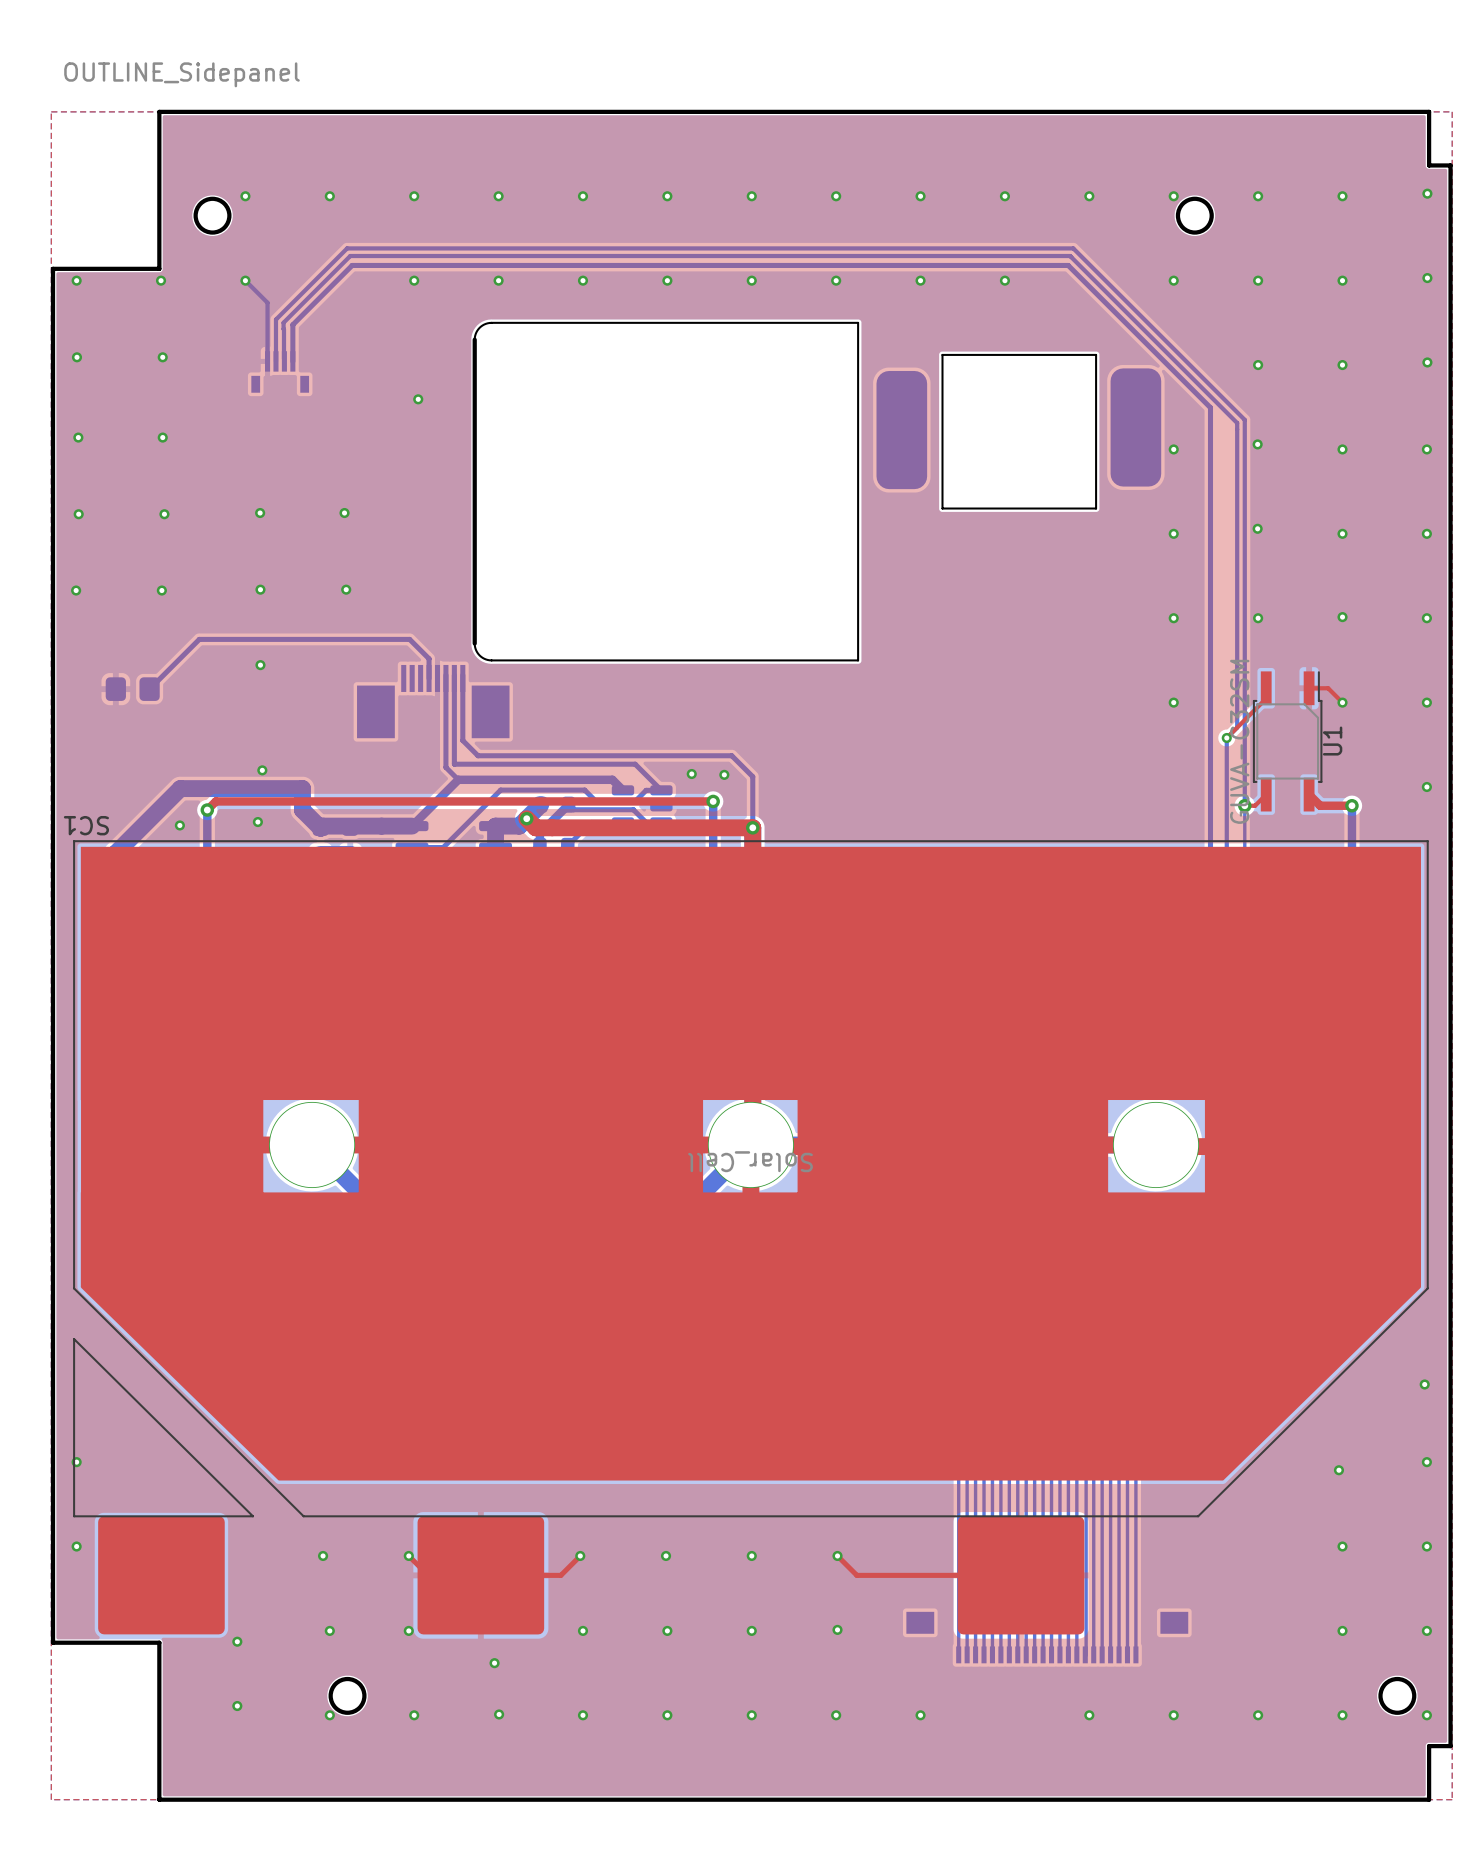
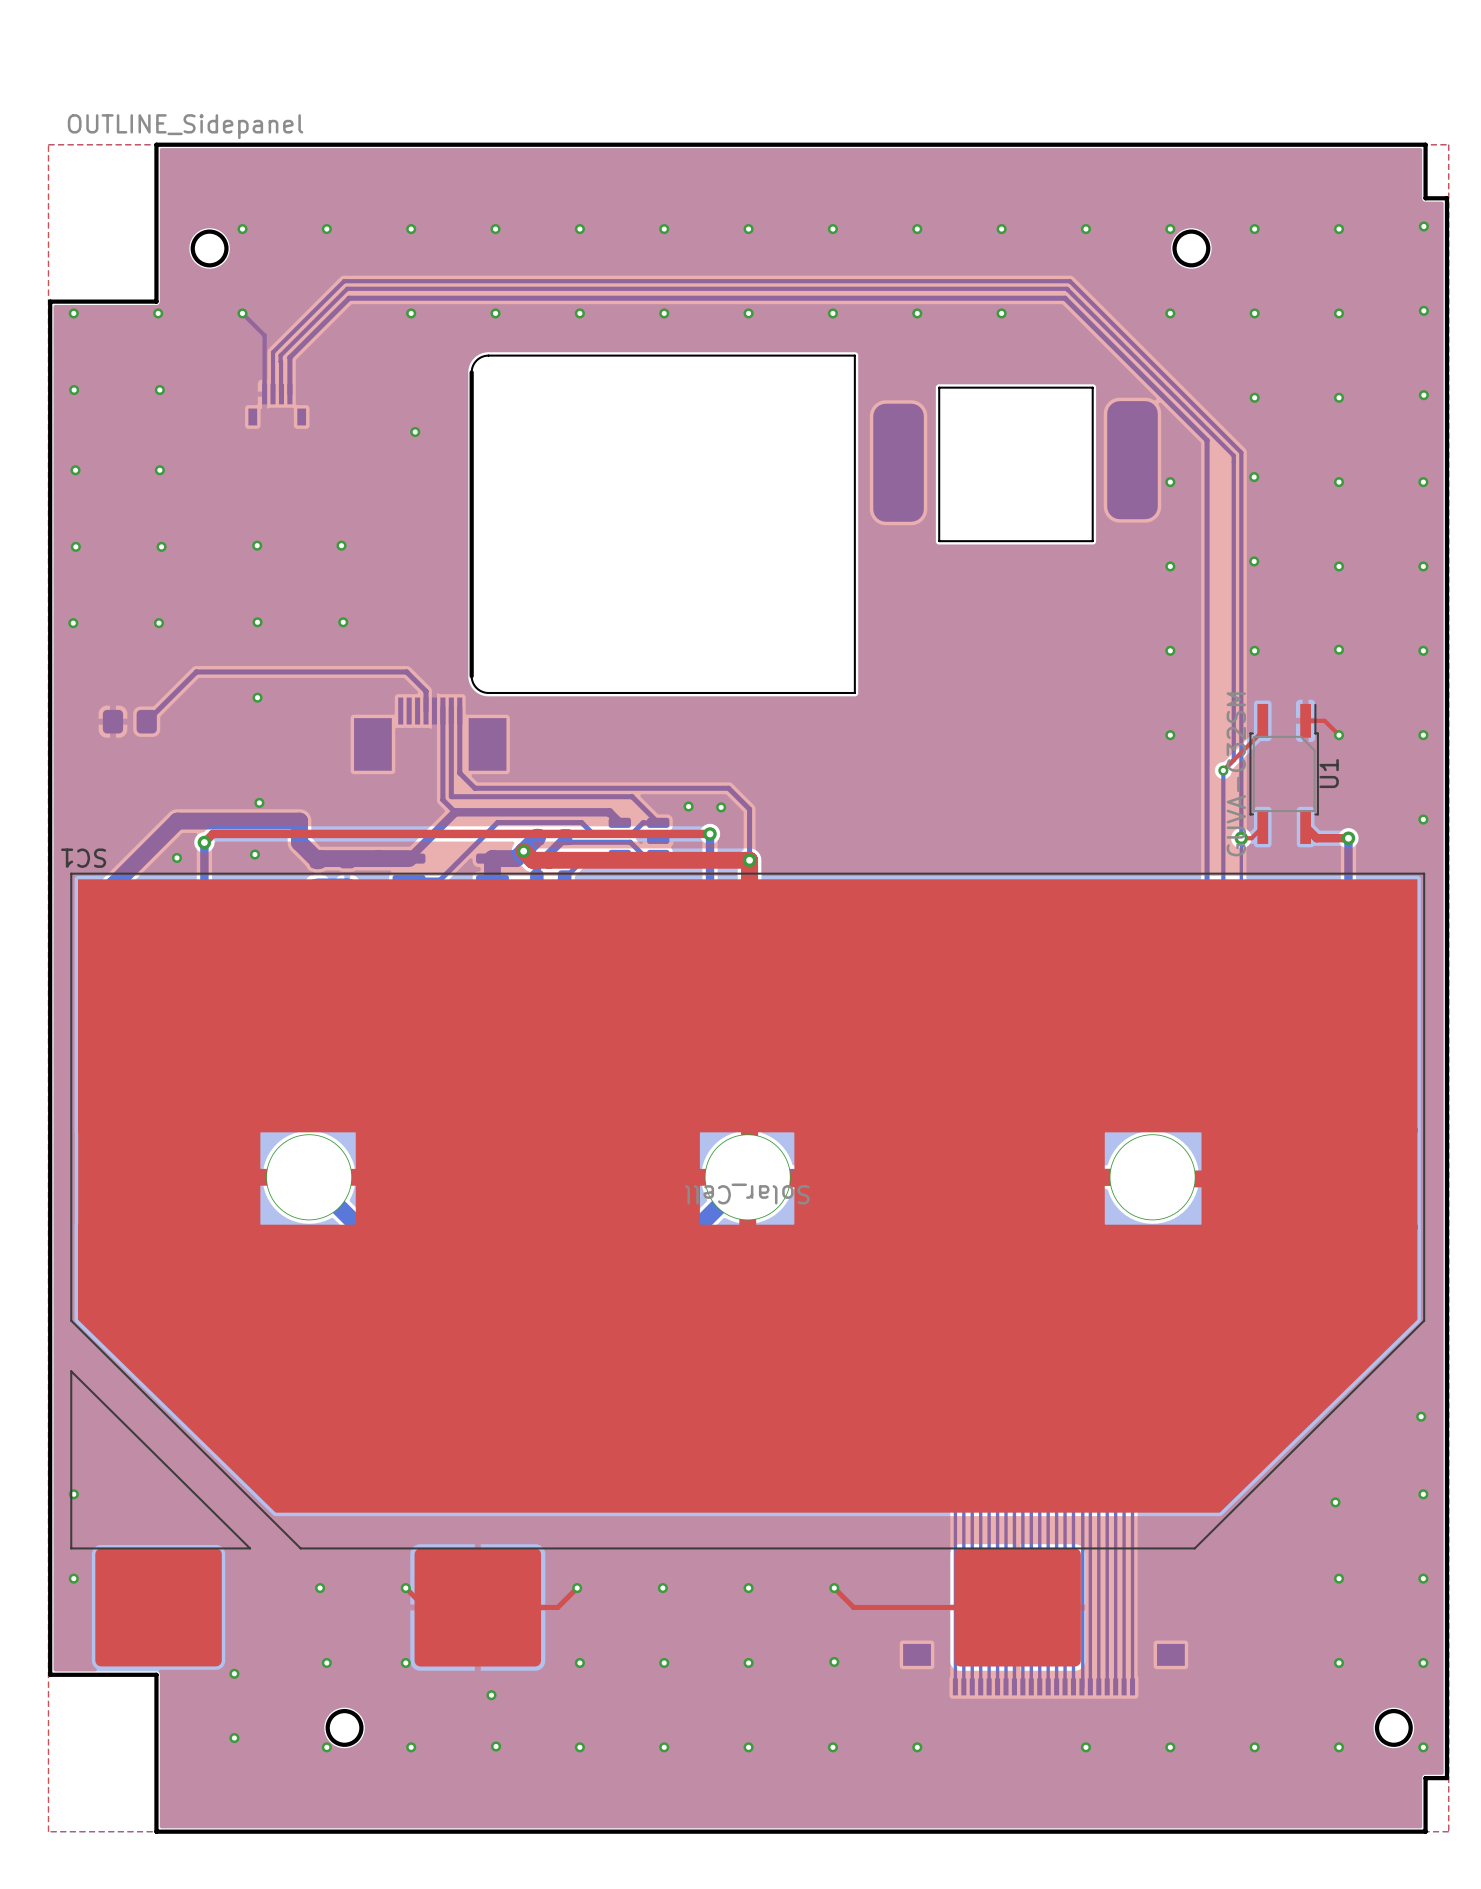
drawing shape: [50, 62, 1453, 1802] -> [48, 114, 1450, 1834]

